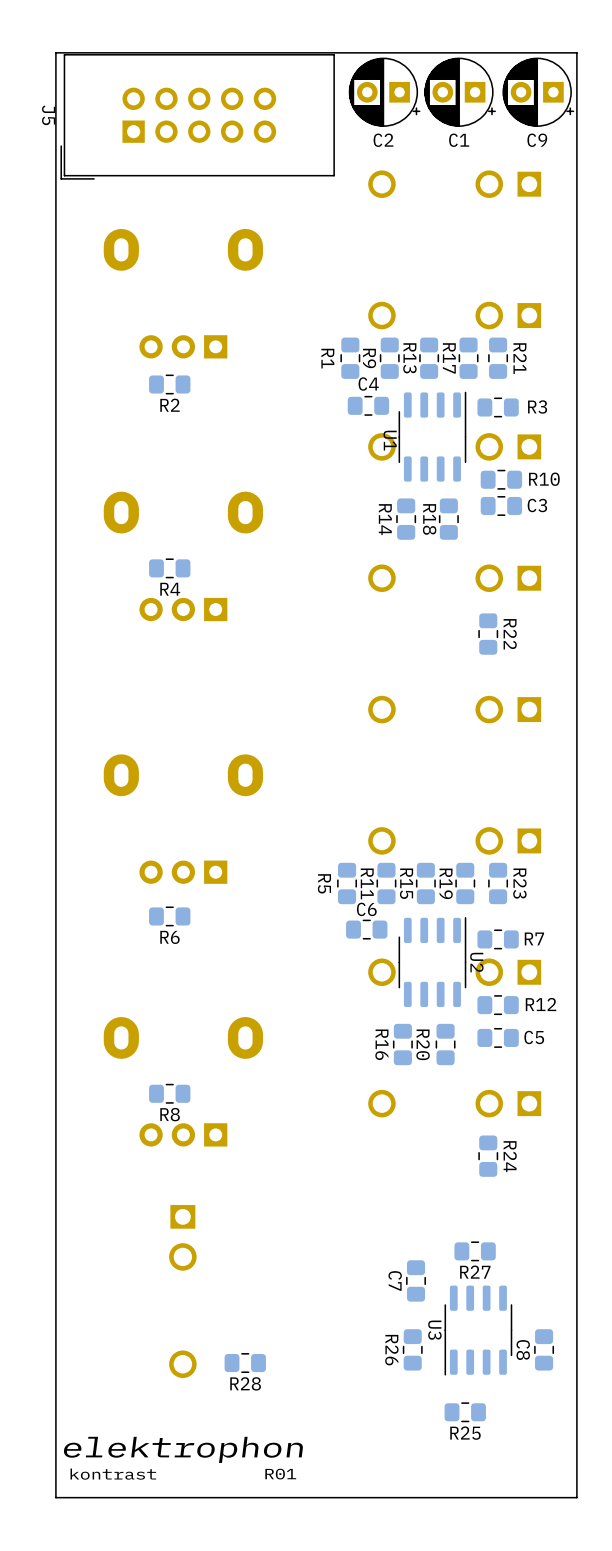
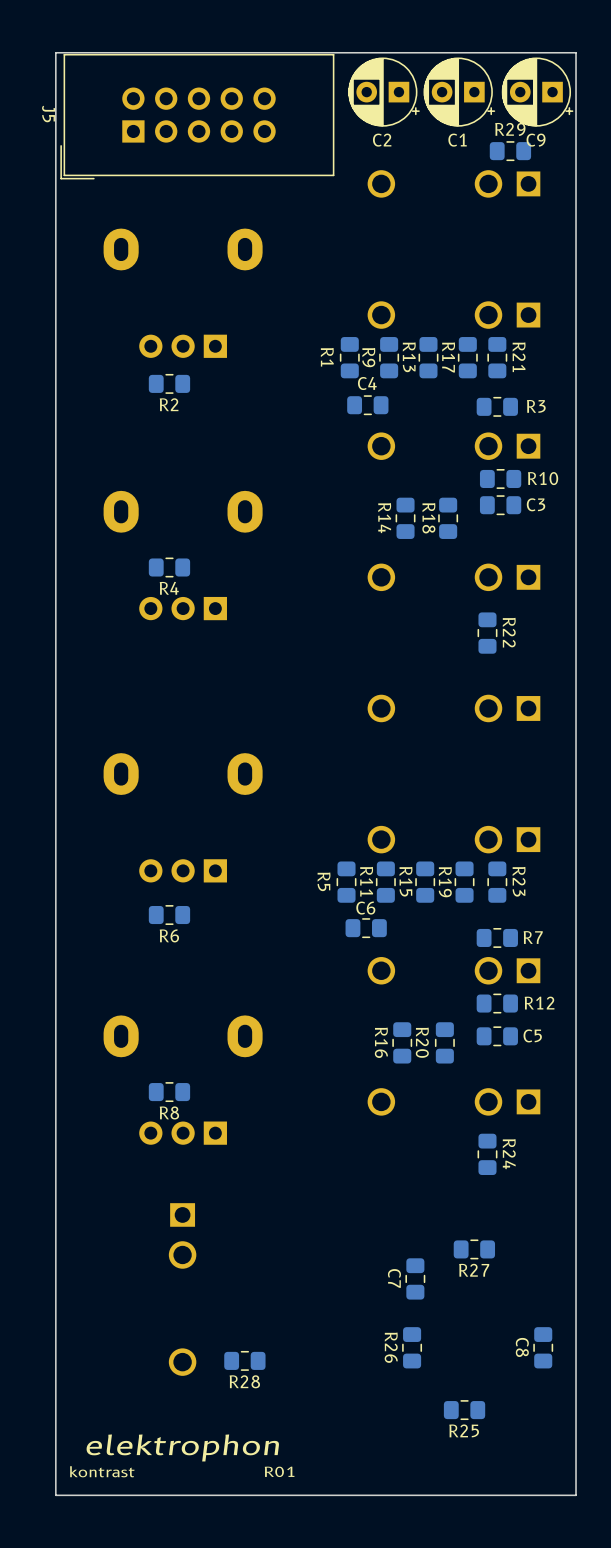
R29: none -> (510, 151)
U1: (432, 436) -> none
U2: (432, 962) -> none
U3: (478, 1330) -> none

